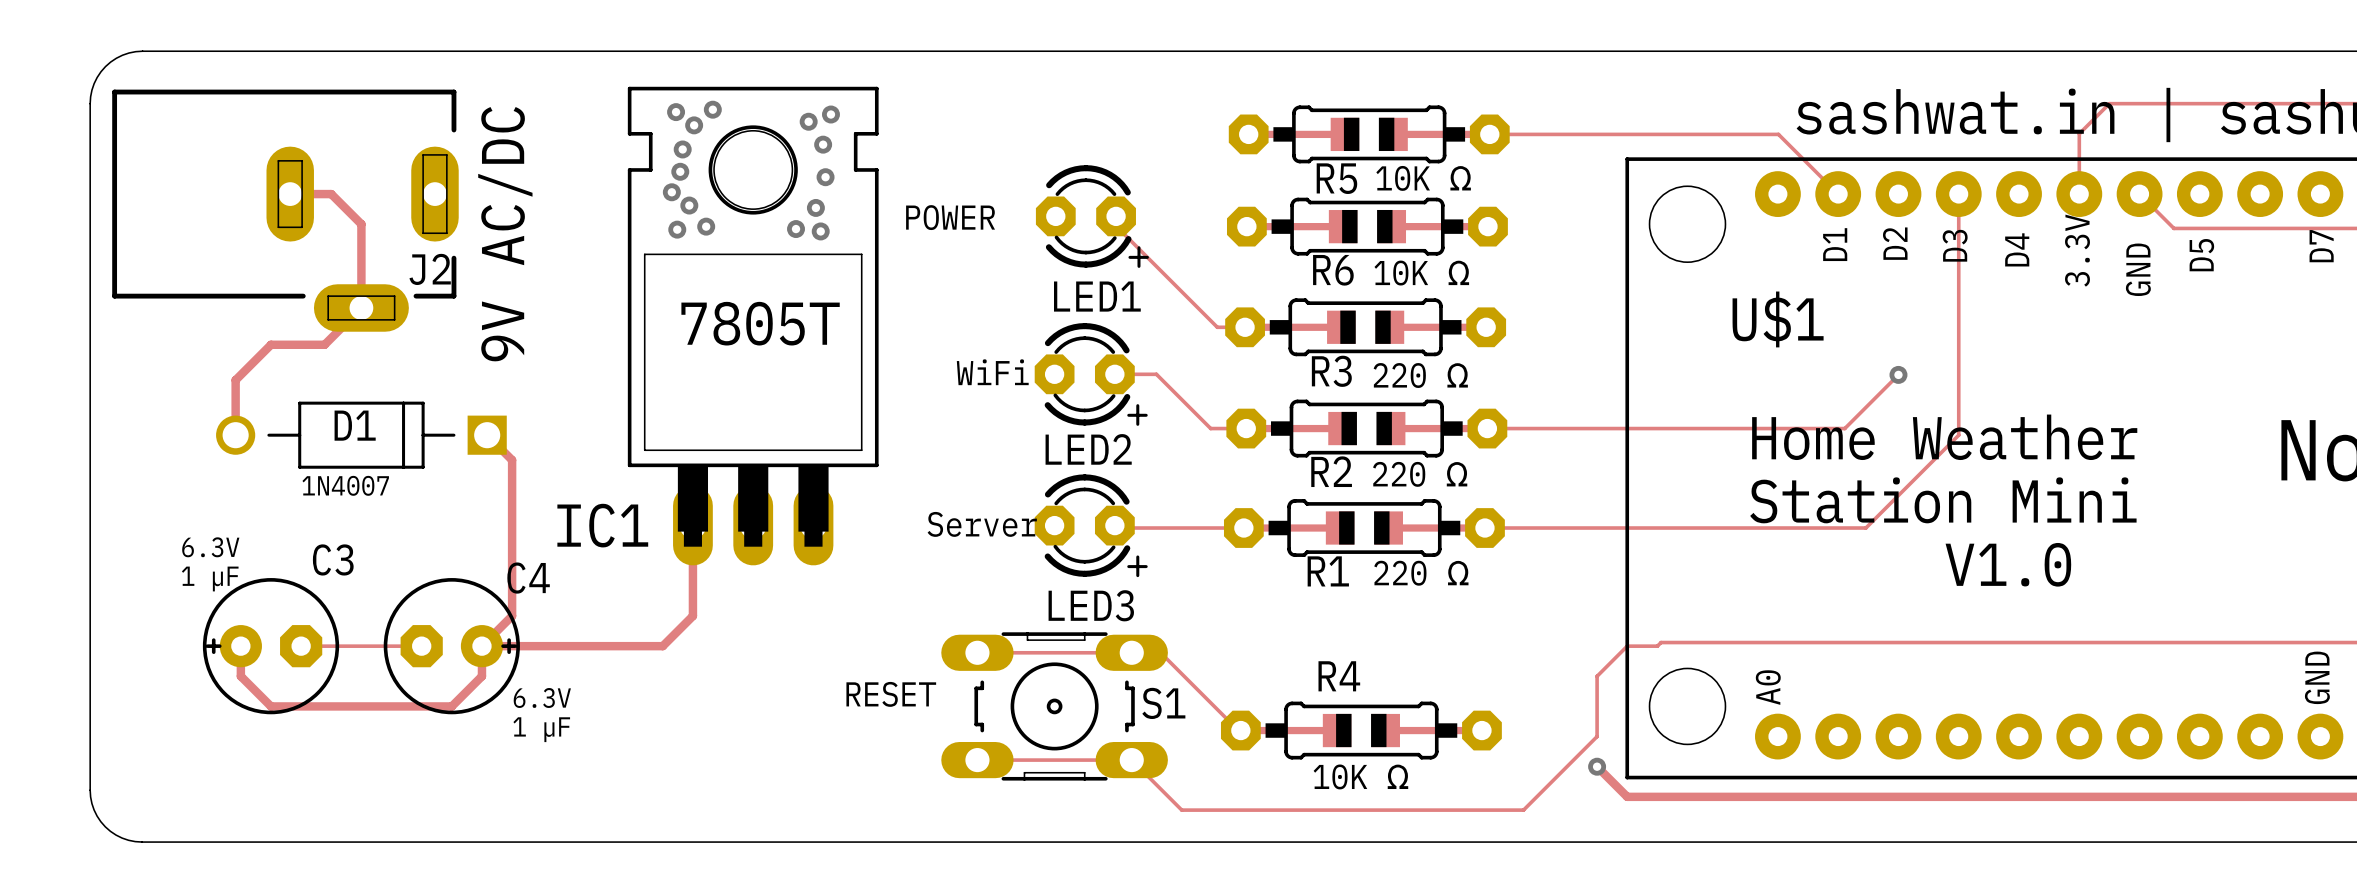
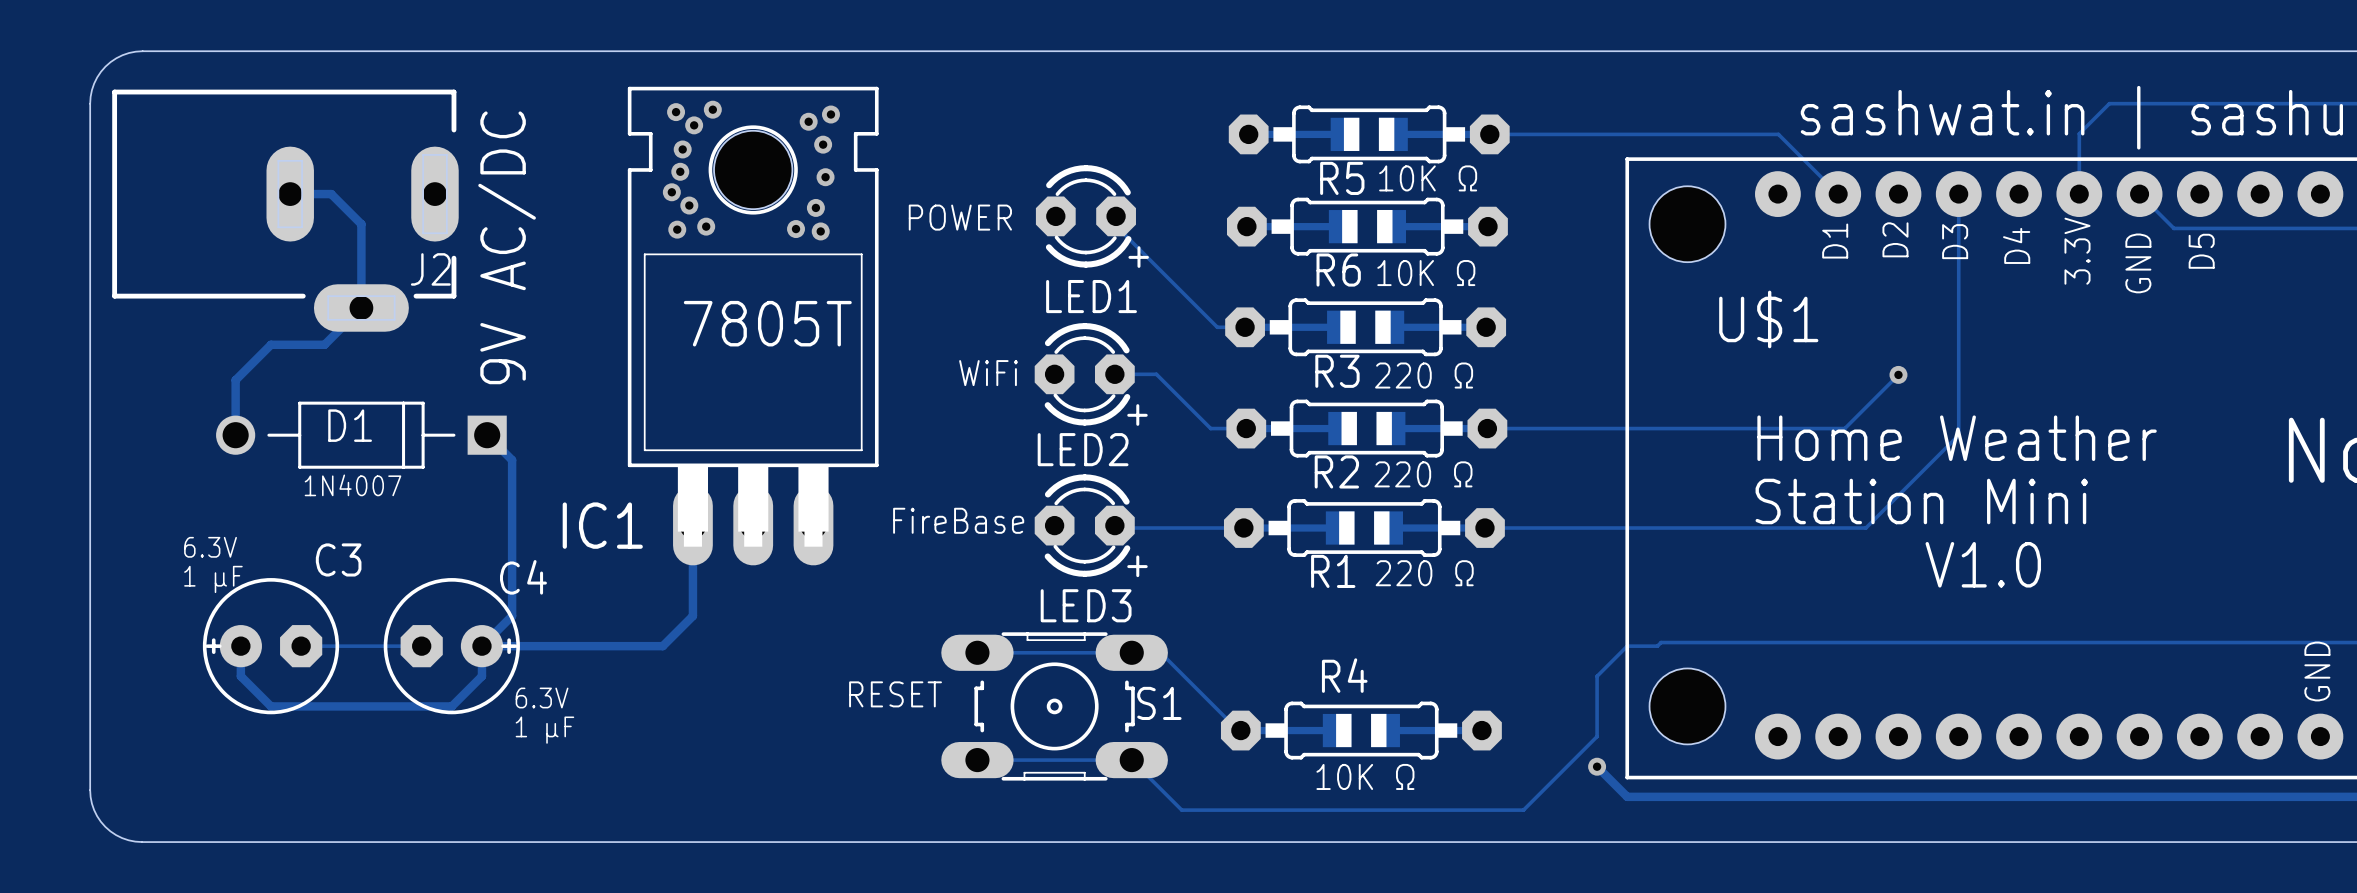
text: D7 (2321, 246) -> none
text: none -> FireBase (958, 520)
text: Server (982, 524) -> none
text: A0 (1768, 687) -> none

